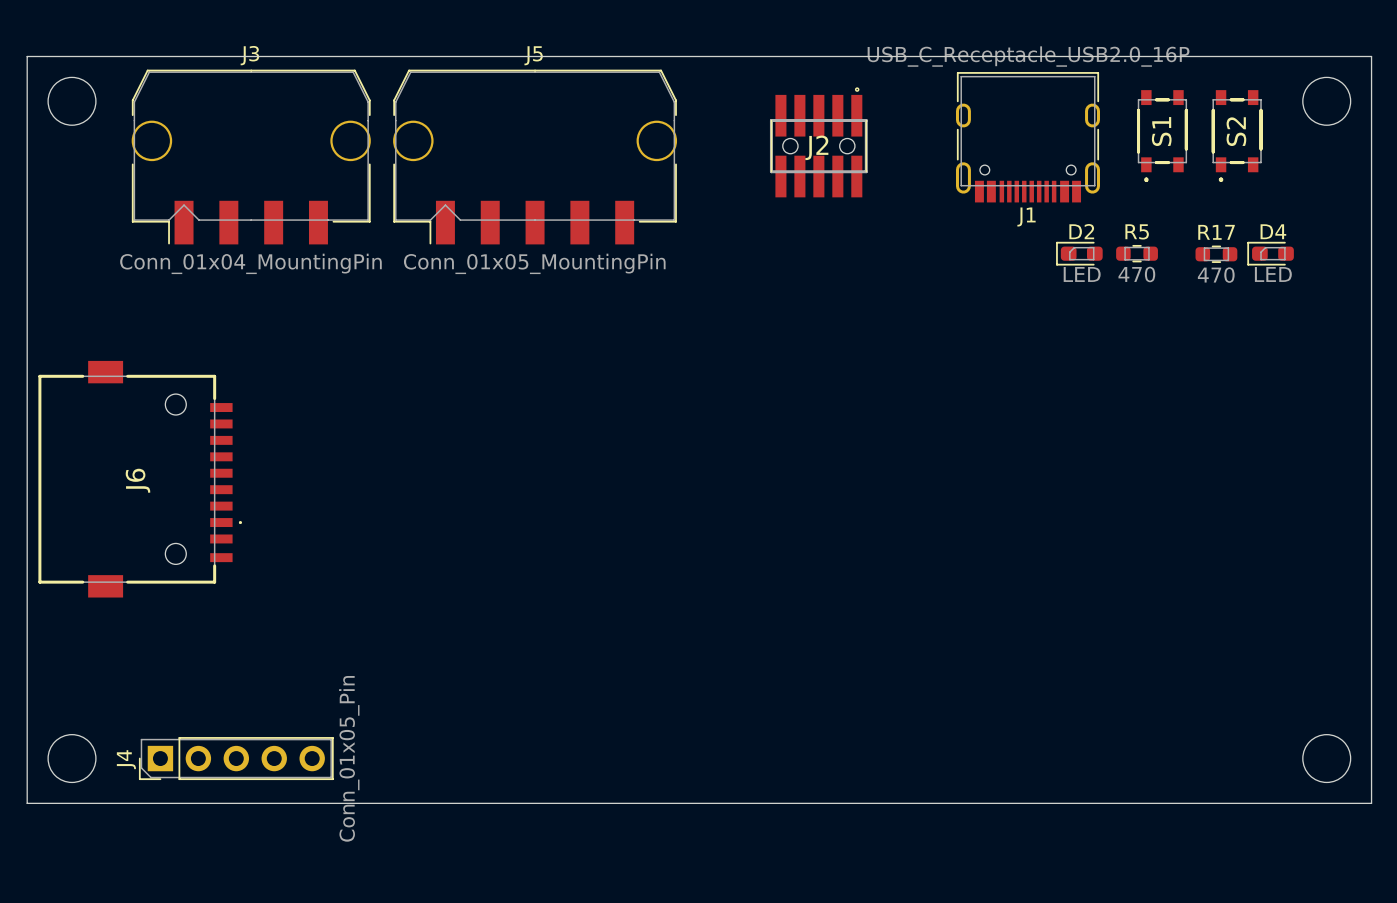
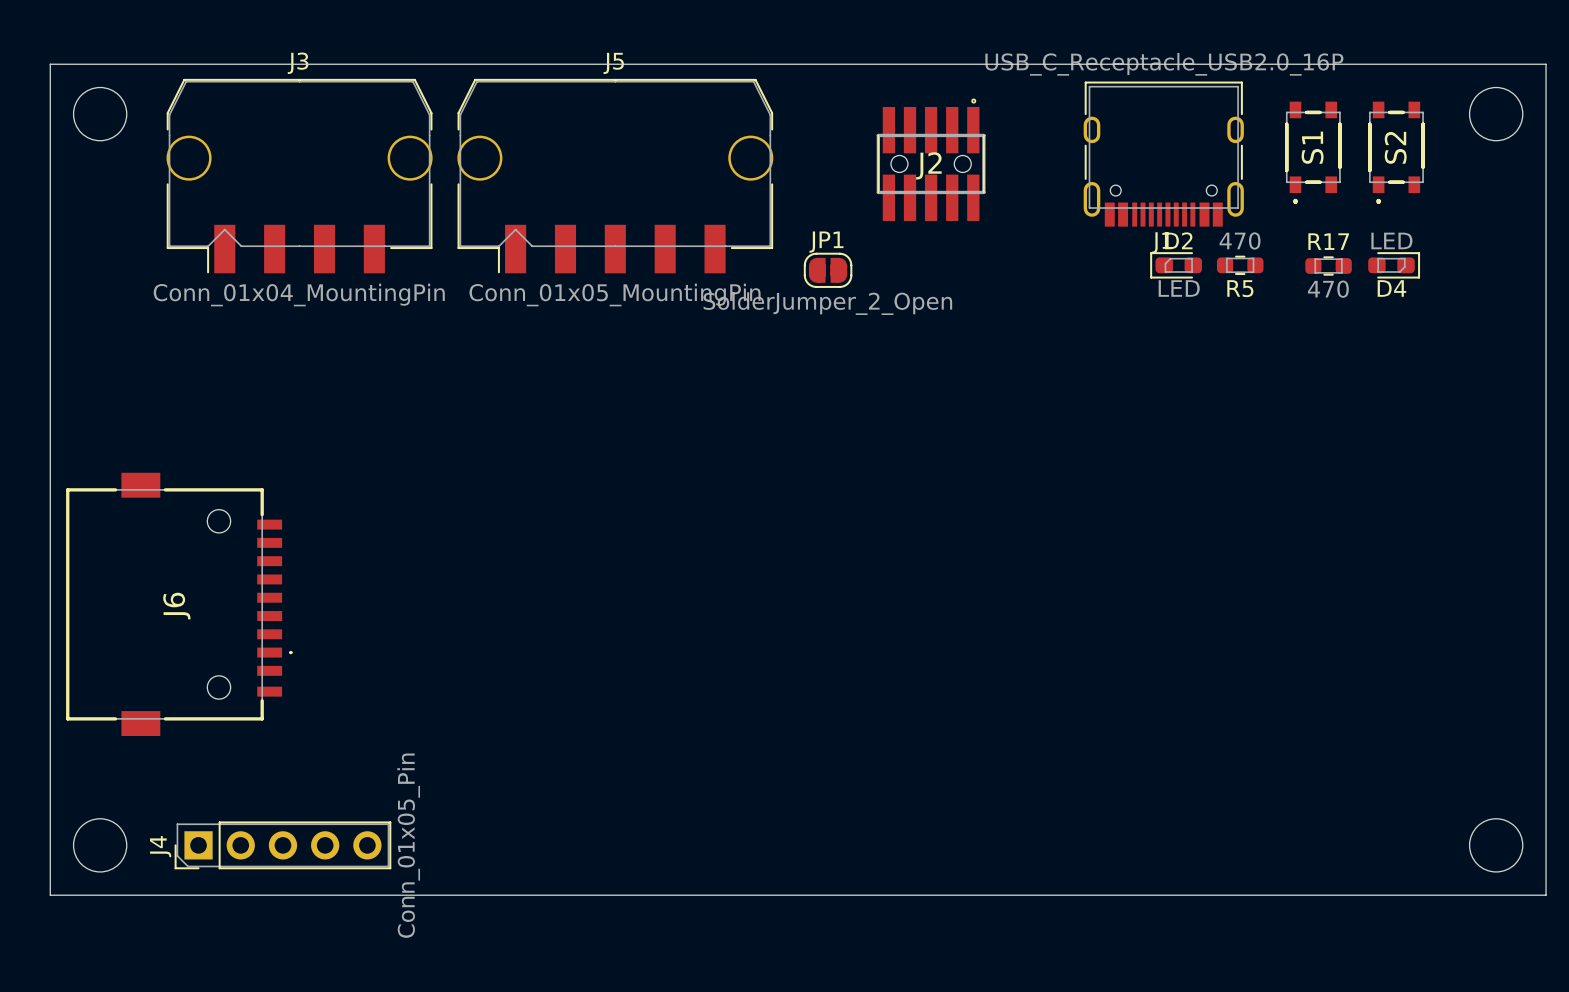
R5 name position: R5 (1137, 231) -> R5 (1240, 288)
JP1: none -> SolderJumper_2_Open (828, 270)
D2 position: (1079, 253) -> (1176, 265)
R5 position: (1137, 253) -> (1240, 265)
D4 rotation: 0° (1270, 253) -> 180° (1394, 265)
D4 position: (1270, 253) -> (1394, 265)
R17 position: (1216, 254) -> (1328, 266)
R5 value position: 470 (1136, 274) -> 470 (1240, 240)
J6 position: (140, 479) -> (179, 604)

